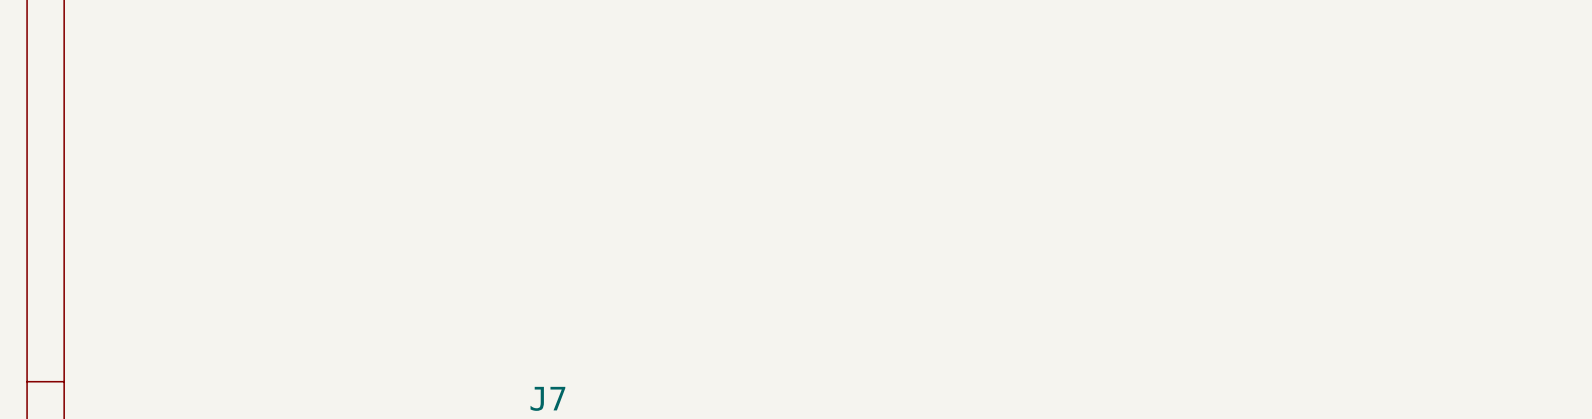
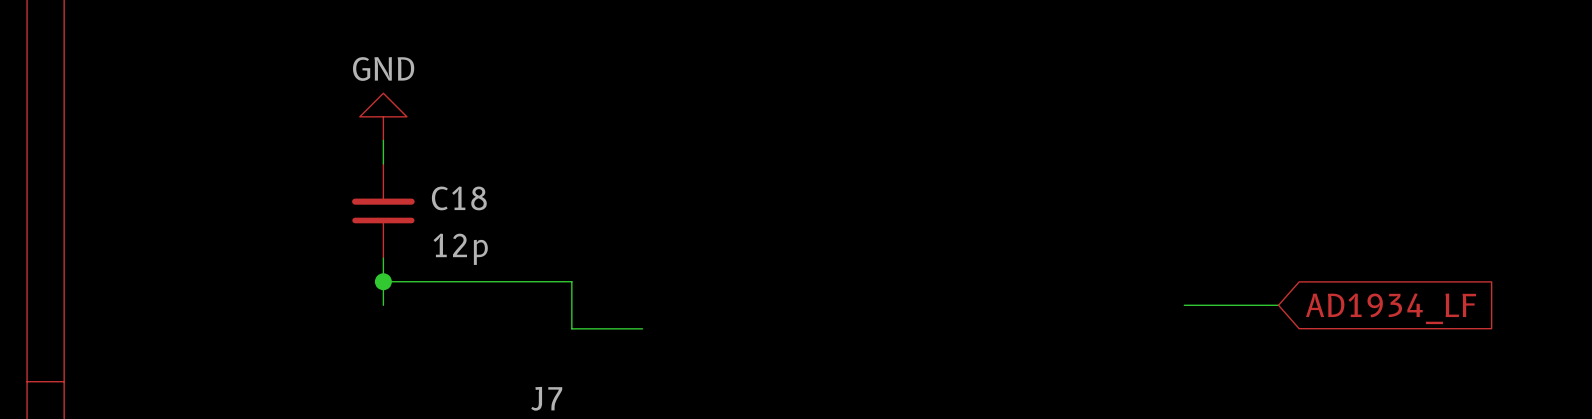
power symbol: none -> GND (383, 116)
wire: none -> (383, 140) (383, 163)
C18: none -> 12p (383, 211)
wire: none -> (383, 258) (383, 305)
wire: none -> (383, 281) (571, 281) (571, 328) (642, 328)
junction: none -> (383, 281)
wire: none -> (1184, 305) (1278, 305)
global label: none -> AD1934_LF (1391, 308)

